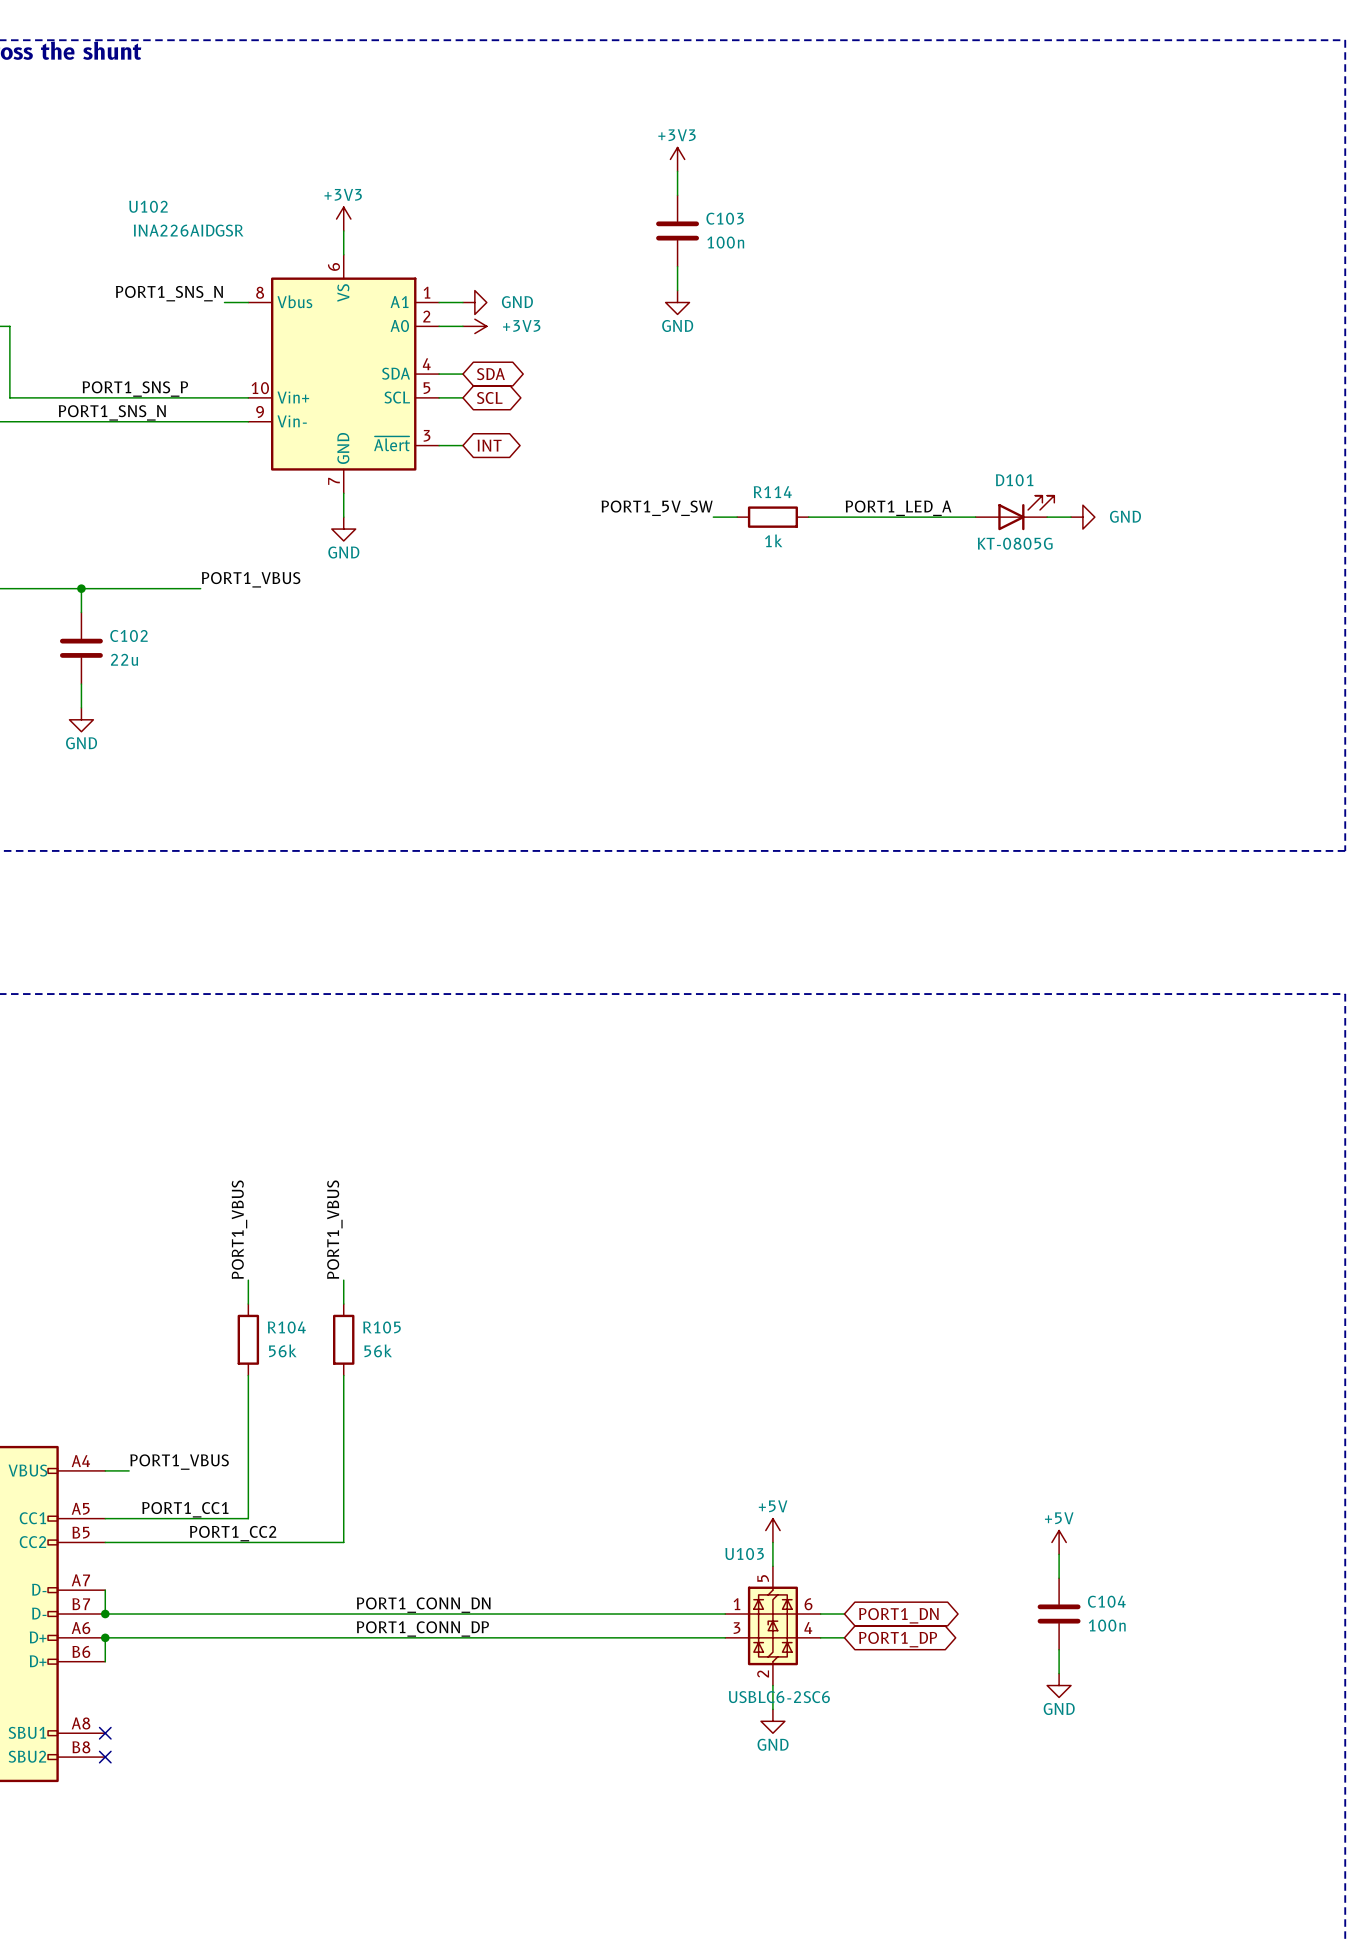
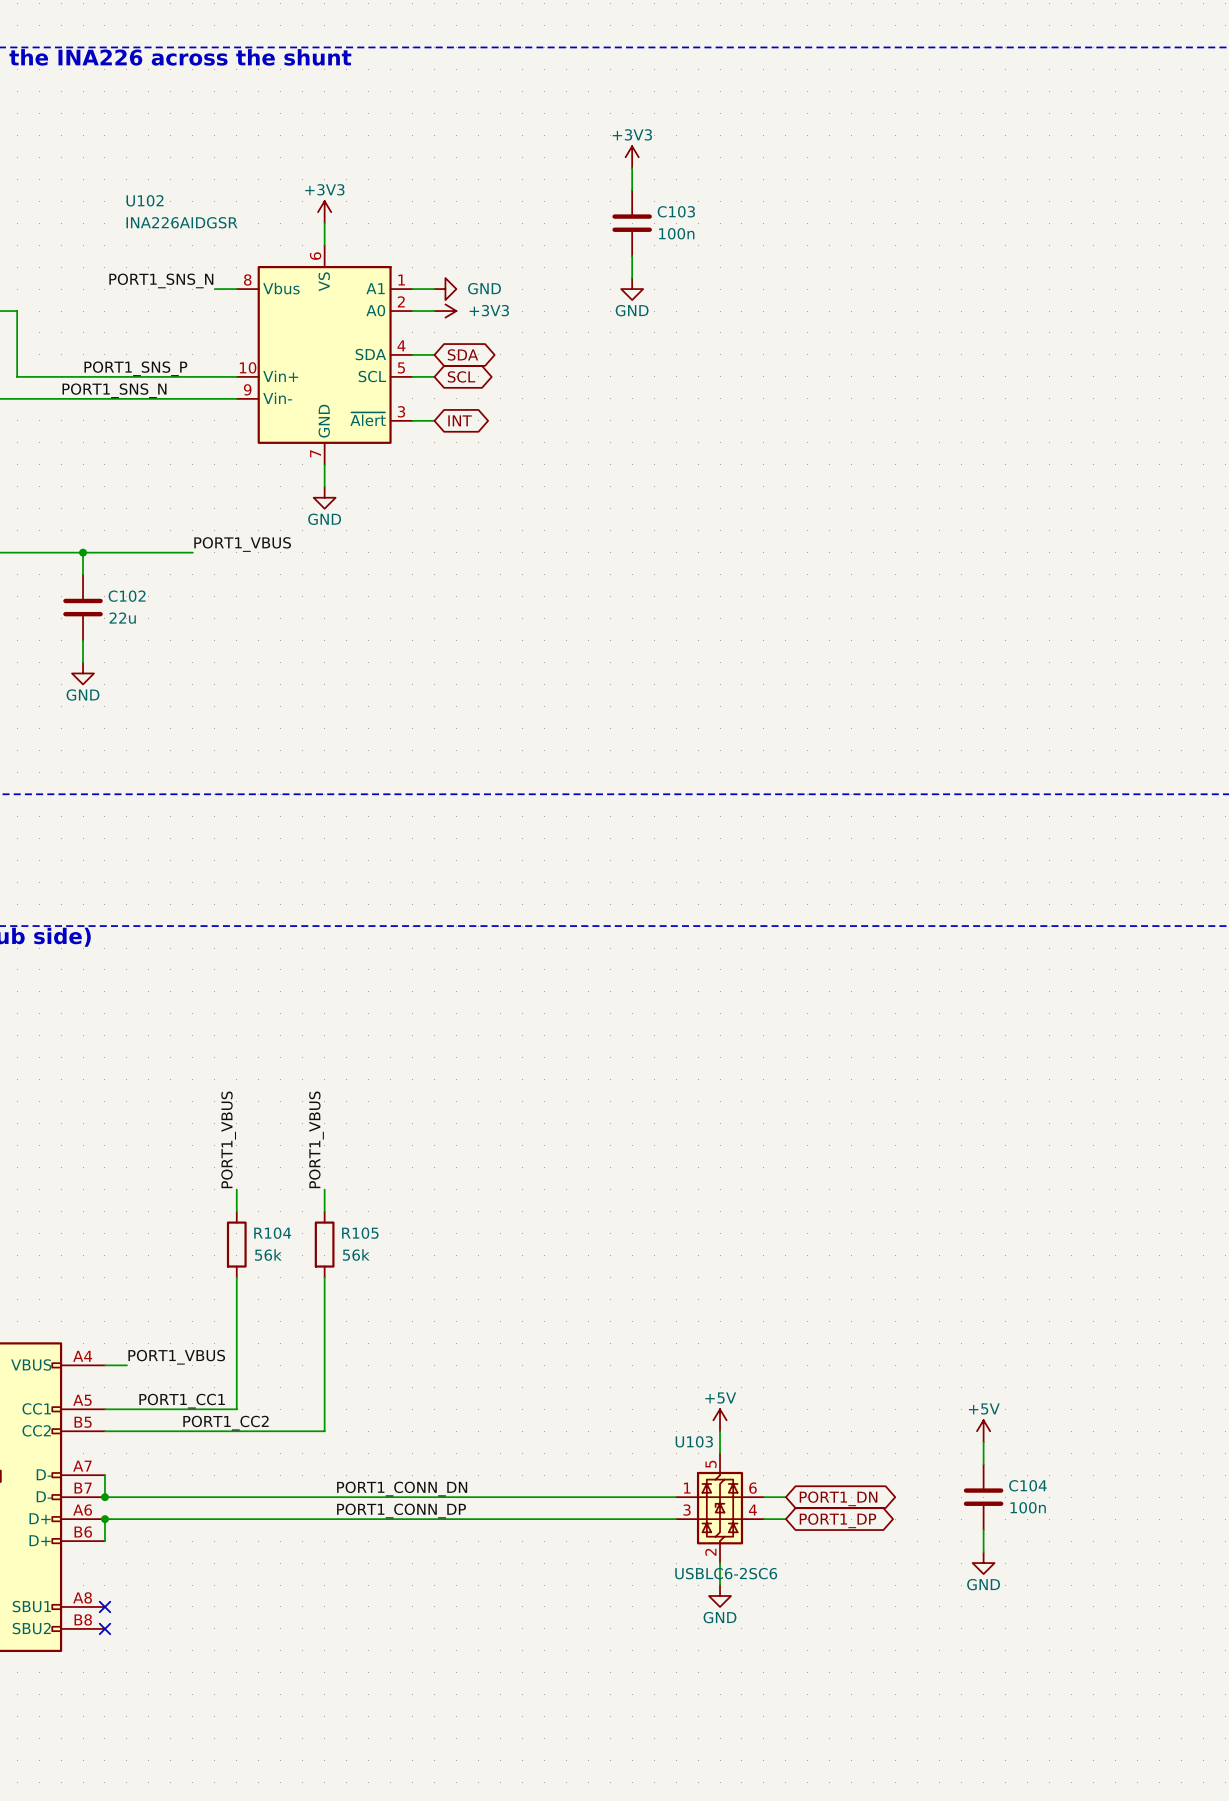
label: PORT1_5V_SW (657, 508) -> none
label: PORT1_LED_A (898, 508) -> none
D101: KT-0805G (1014, 512) -> none
wire: (713, 517) (737, 517) -> none
R114: 1k (772, 517) -> none
wire: (808, 517) (975, 517) -> none
wire: (1047, 517) (1071, 517) -> none
power symbol: GND (1082, 517) -> none

